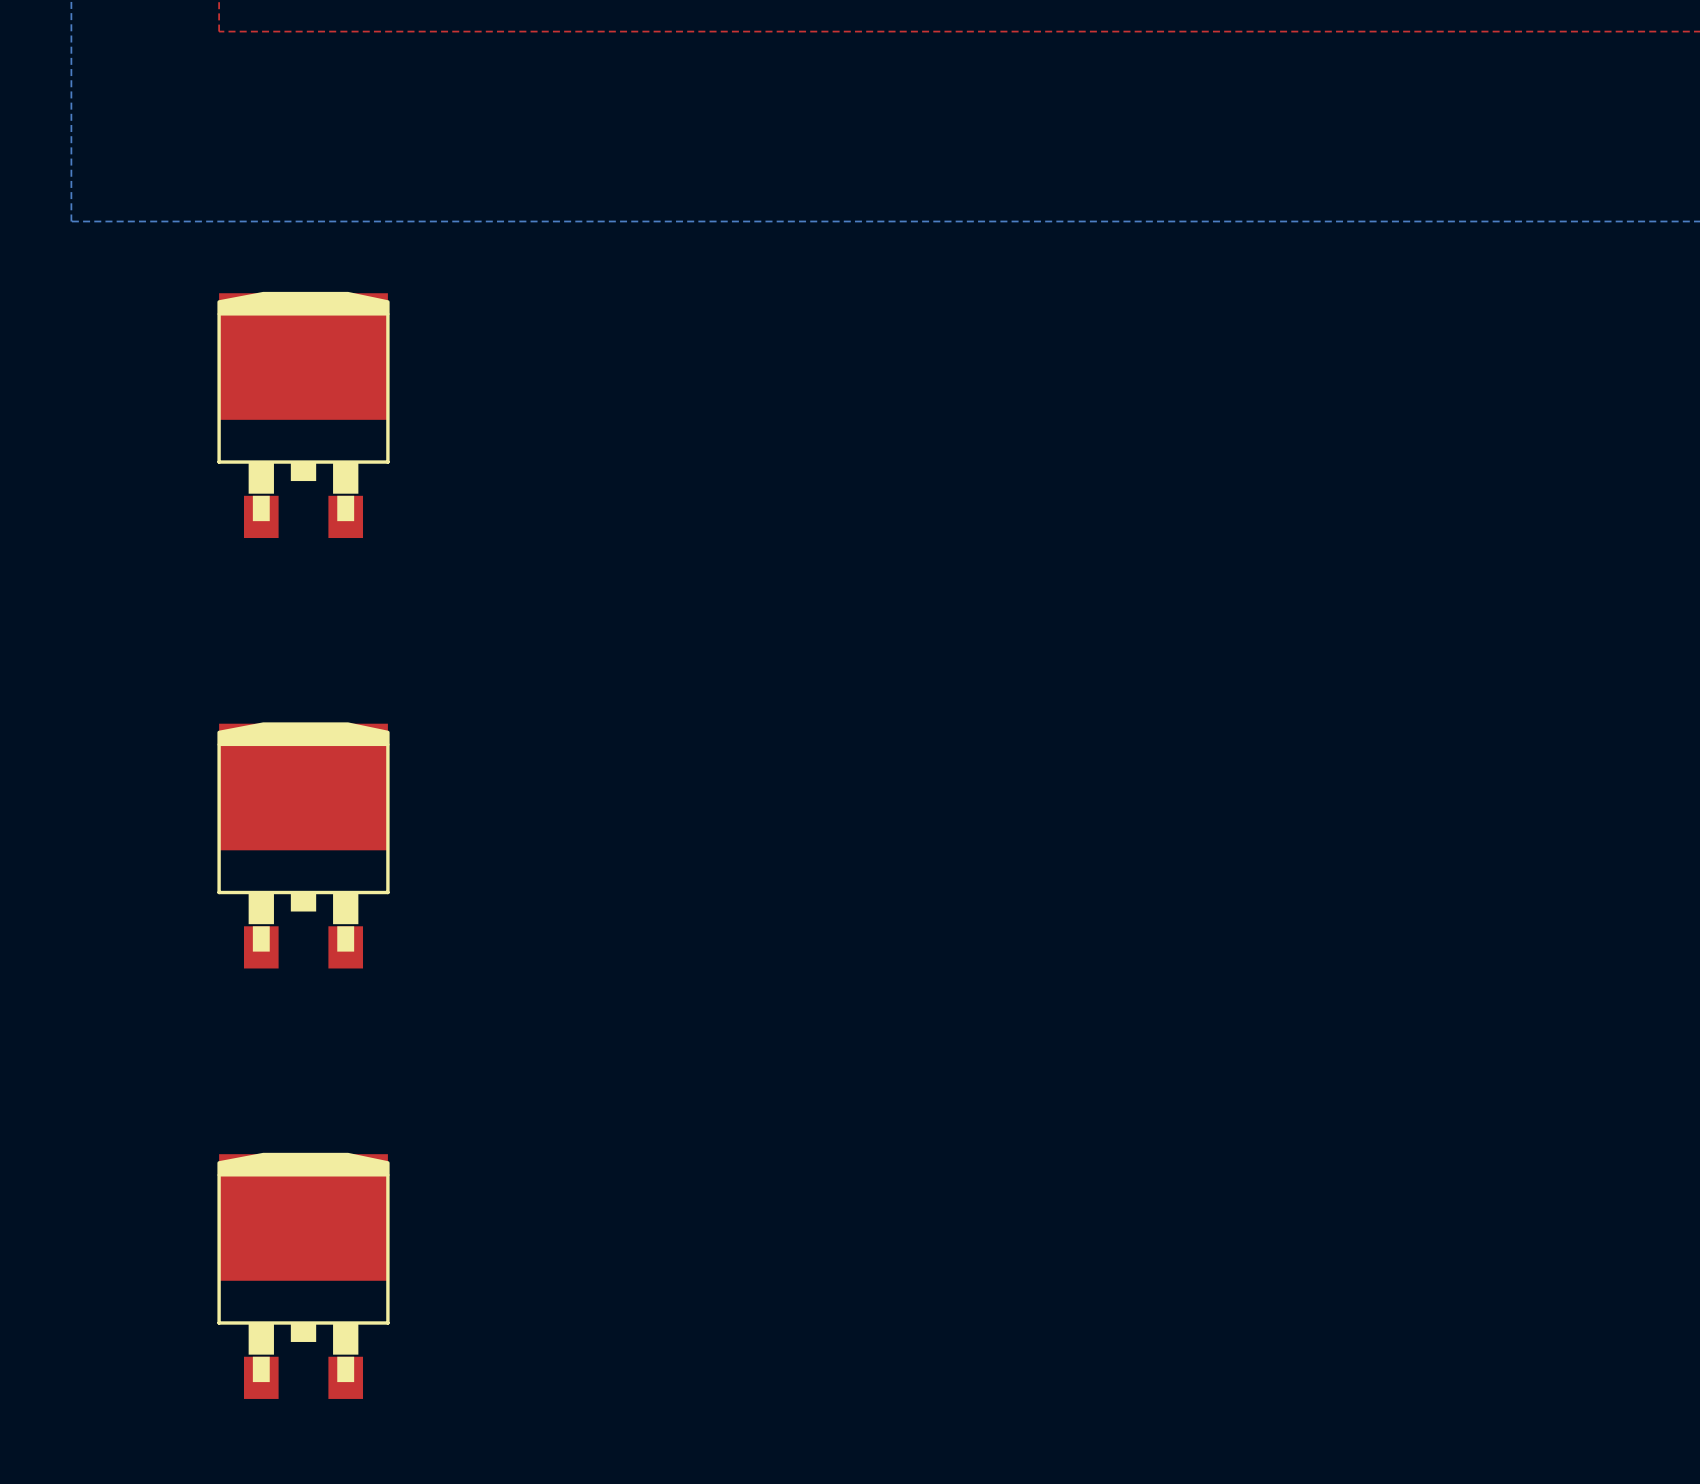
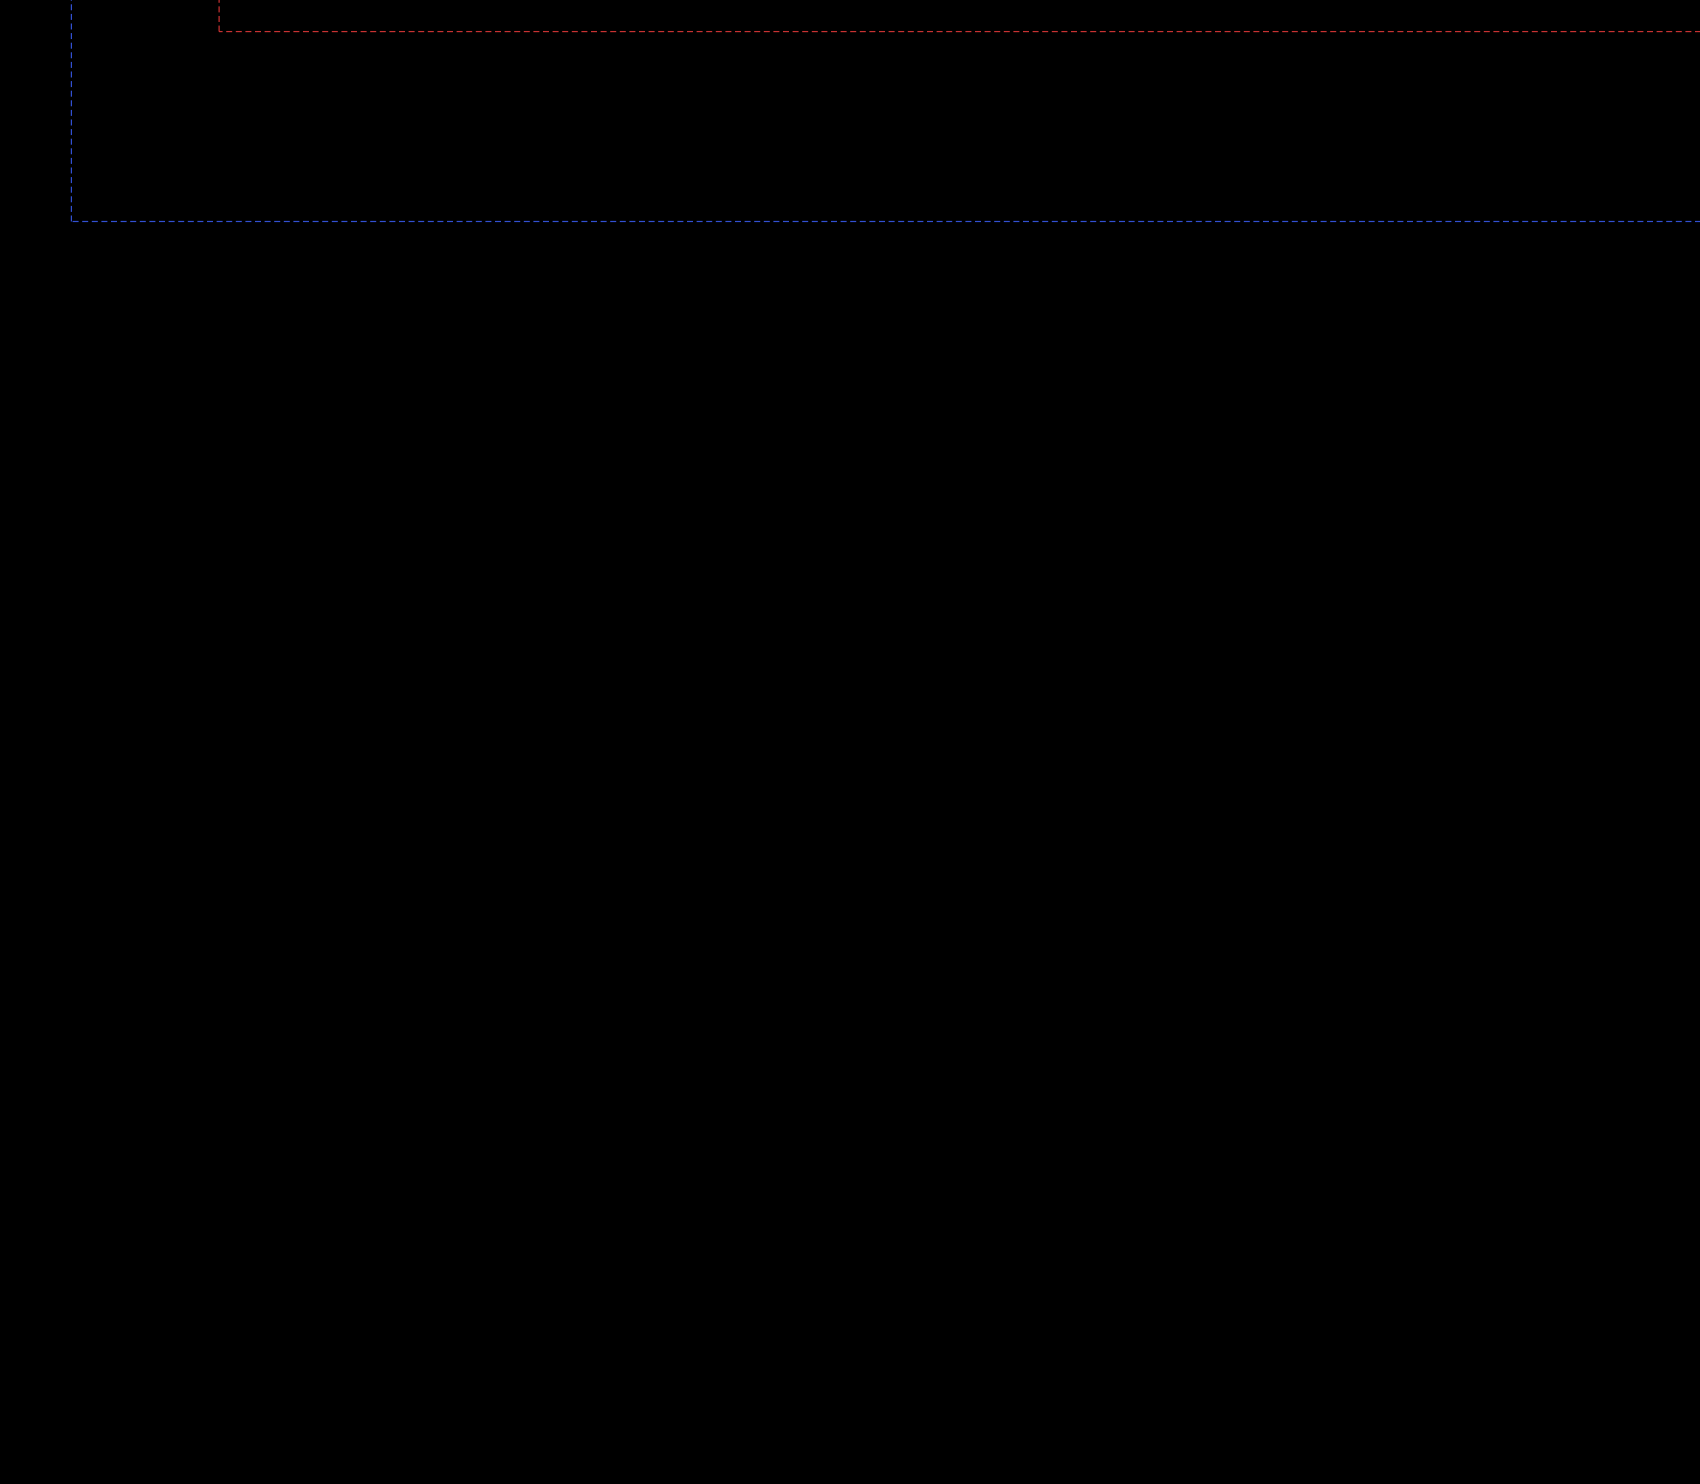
part: (303, 414) -> none
part: (303, 845) -> none
part: (303, 1275) -> none

